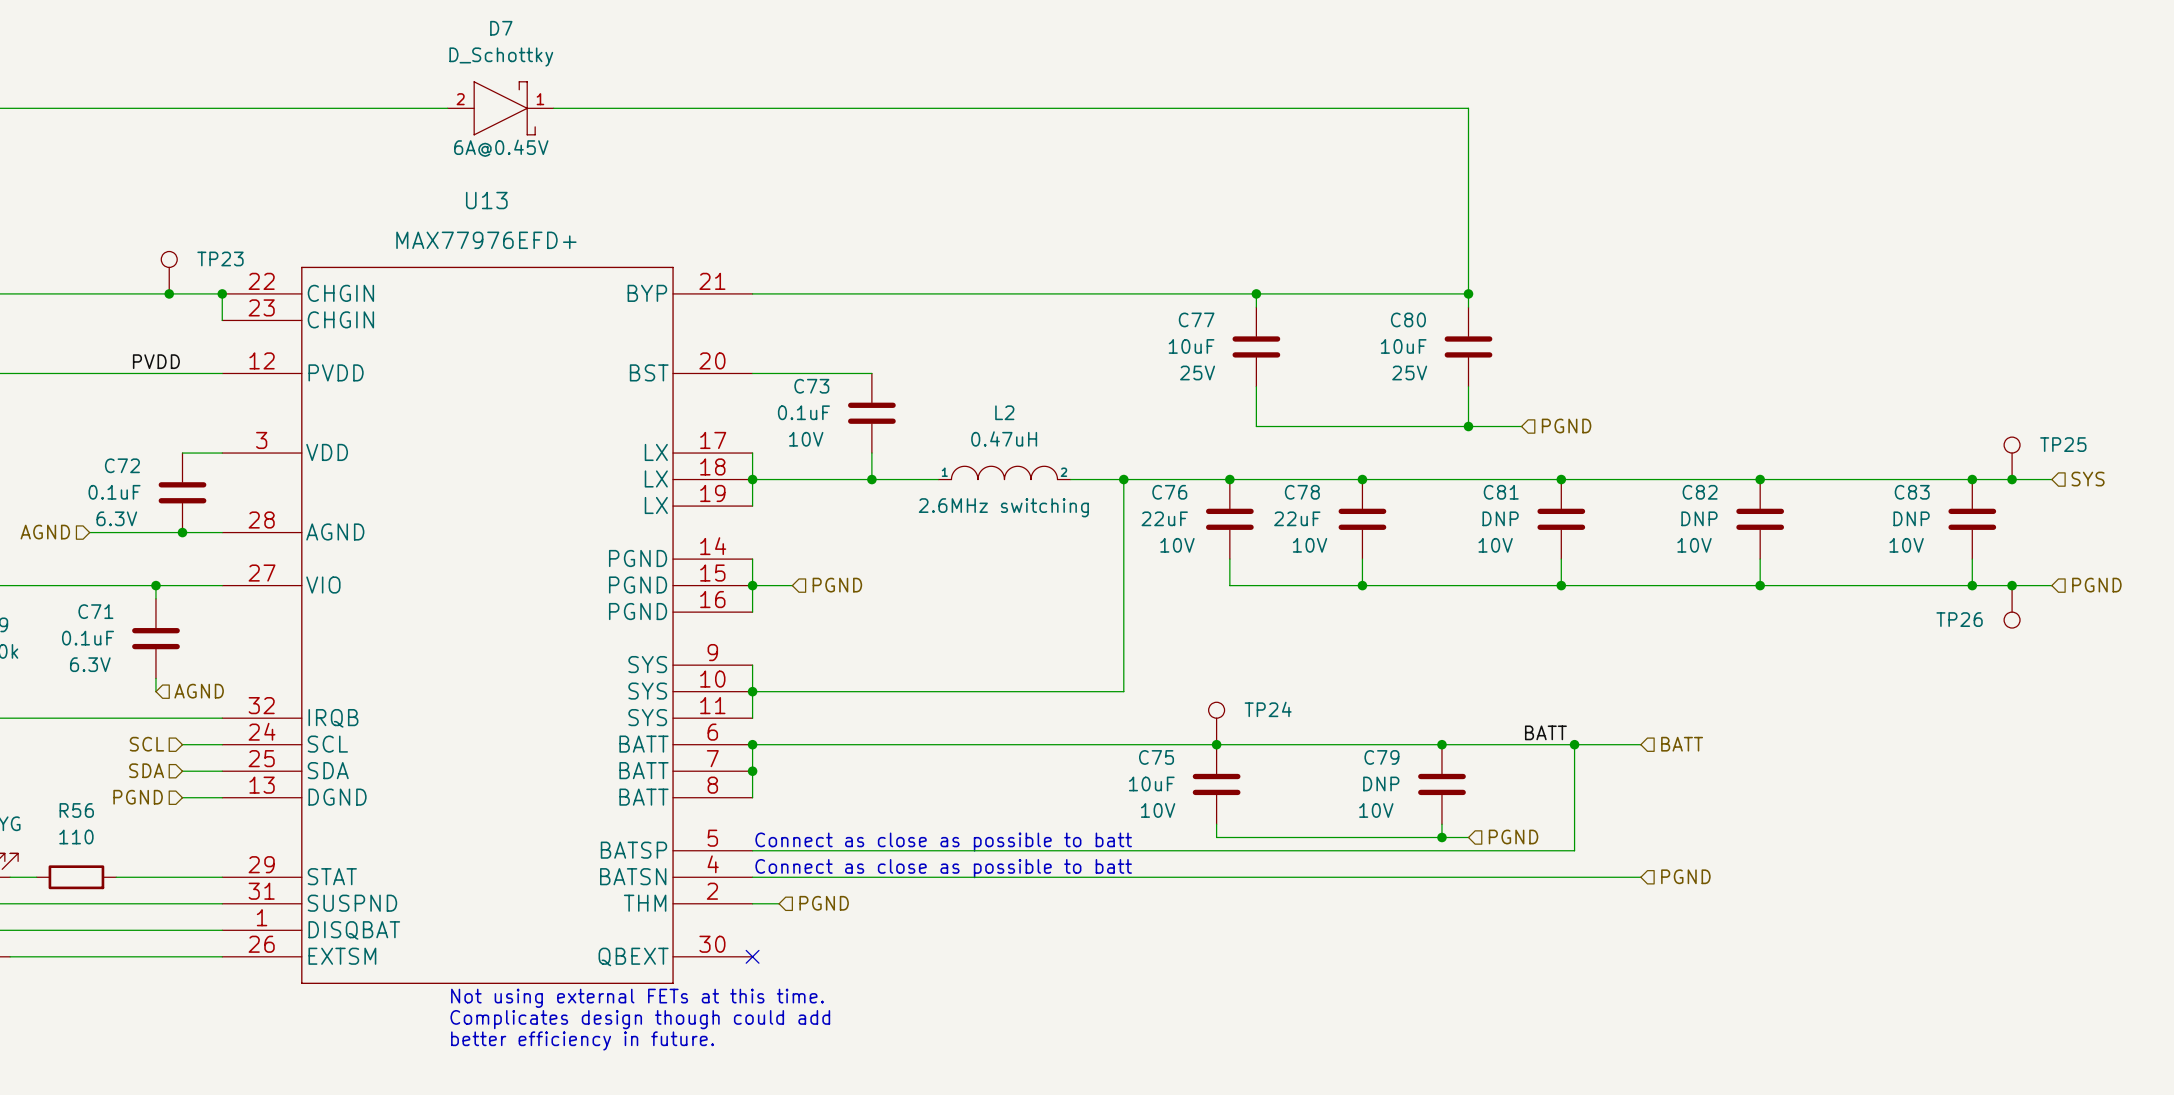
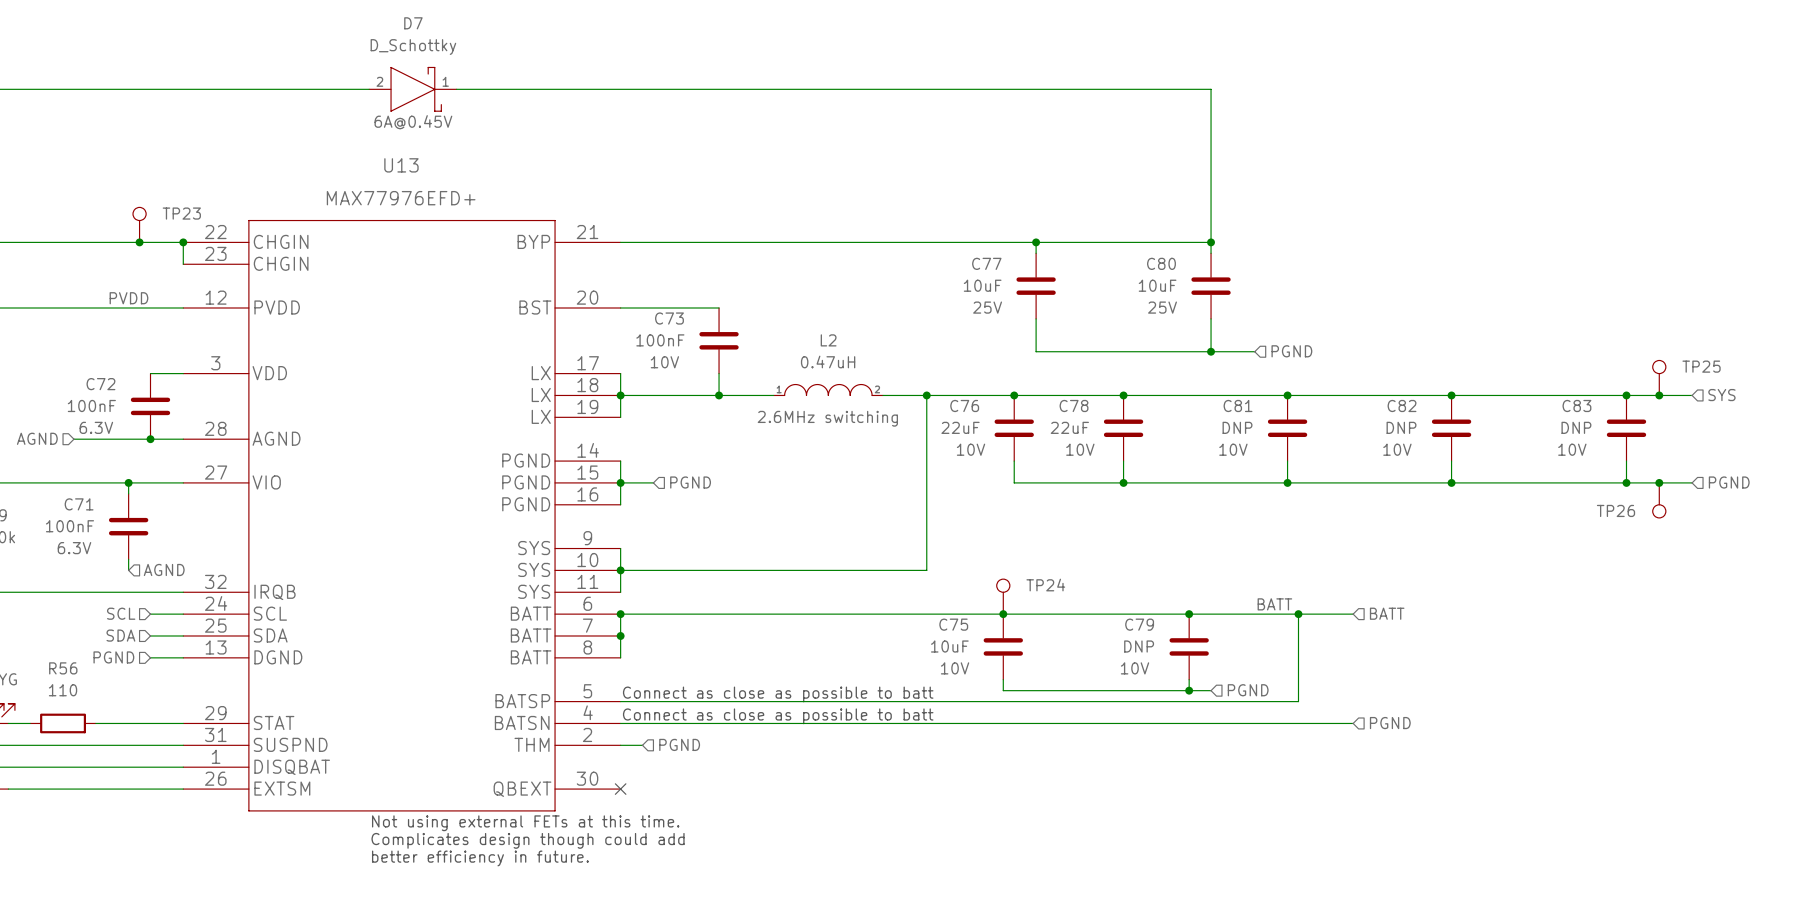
C73 value: 0.1uF (803, 412) -> 100nF (660, 340)
C72 value: 0.1uF (114, 492) -> 100nF (91, 405)
C71 value: 0.1uF (88, 638) -> 100nF (69, 526)

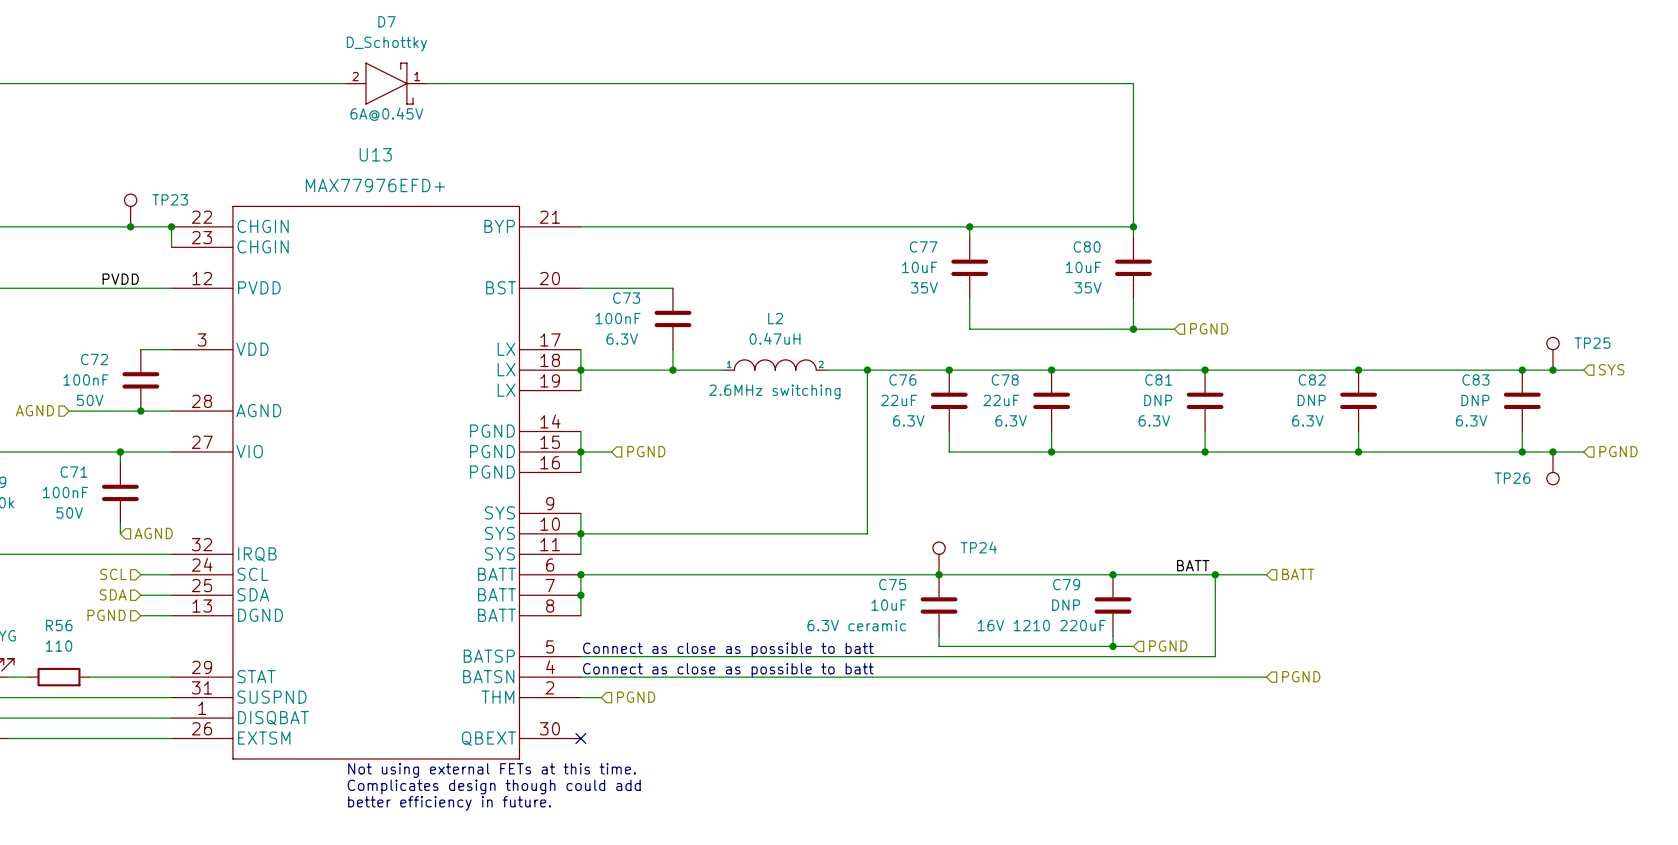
C77 text: 25V (987, 307) -> 35V (924, 287)
C80 text: 25V (1162, 307) -> 35V (1088, 287)
C73 text: 10V (664, 362) -> 6.3V (622, 339)
C72 text: 6.3V (96, 427) -> 50V (90, 400)
C76 text: 10V (971, 449) -> 6.3V (908, 420)
C78 text: 10V (1080, 449) -> 6.3V (1011, 420)
C81 text: 10V (1233, 449) -> 6.3V (1154, 420)
C82 text: 10V (1397, 449) -> 6.3V (1307, 420)
C83 text: 10V (1572, 449) -> 6.3V (1471, 420)
C71 text: 6.3V (74, 548) -> 50V (69, 513)
C75 text: 10V (955, 668) -> 6.3V ceramic (856, 625)
C79 text: 10V (1135, 668) -> 16V 1210 220uF (1041, 625)

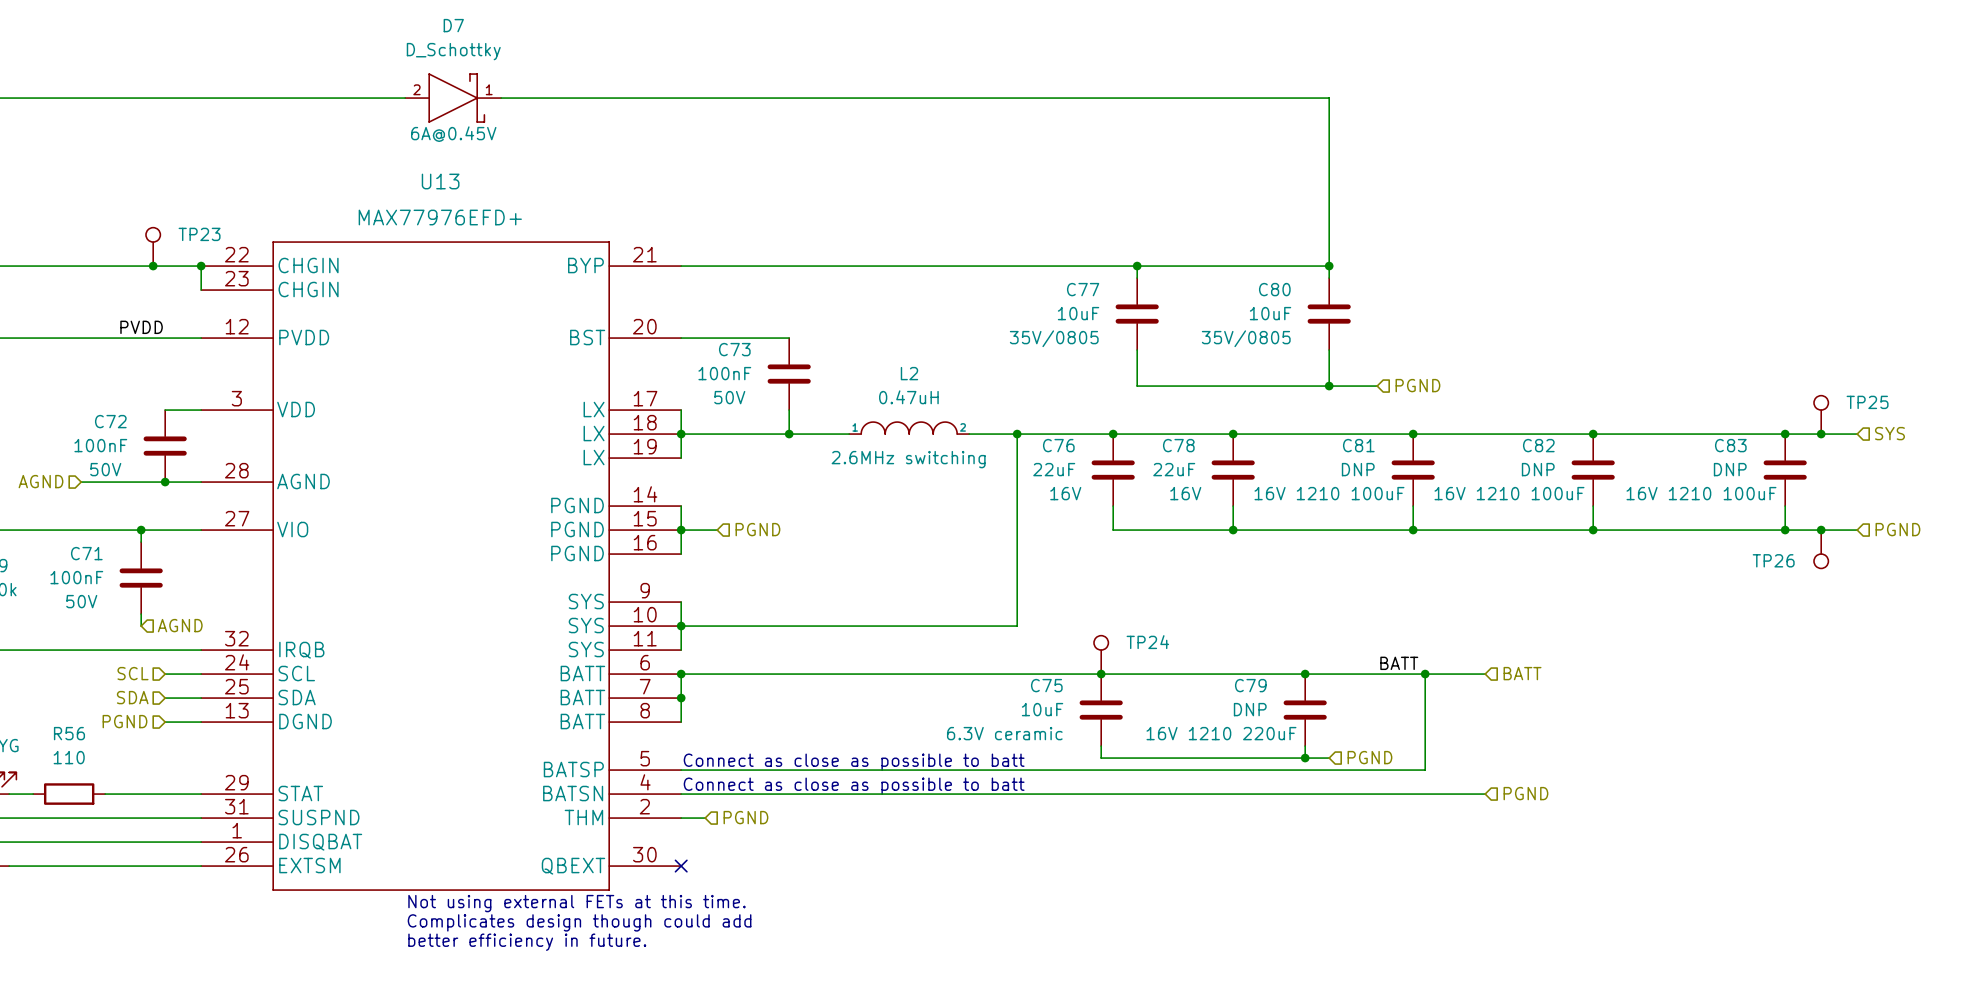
C77 text: 35V (924, 287) -> 35V/0805 (1054, 338)
C80 text: 35V (1088, 287) -> 35V/0805 (1246, 338)
C73 text: 6.3V (622, 339) -> 50V (729, 397)
C76 text: 6.3V (908, 420) -> 16V (1065, 493)
C78 text: 6.3V (1011, 420) -> 16V (1185, 493)
C81 text: 6.3V (1154, 420) -> 16V 1210 100uF (1329, 493)
C82 text: 6.3V (1307, 420) -> 16V 1210 100uF (1509, 493)
C83 text: 6.3V (1471, 420) -> 16V 1210 100uF (1701, 493)

